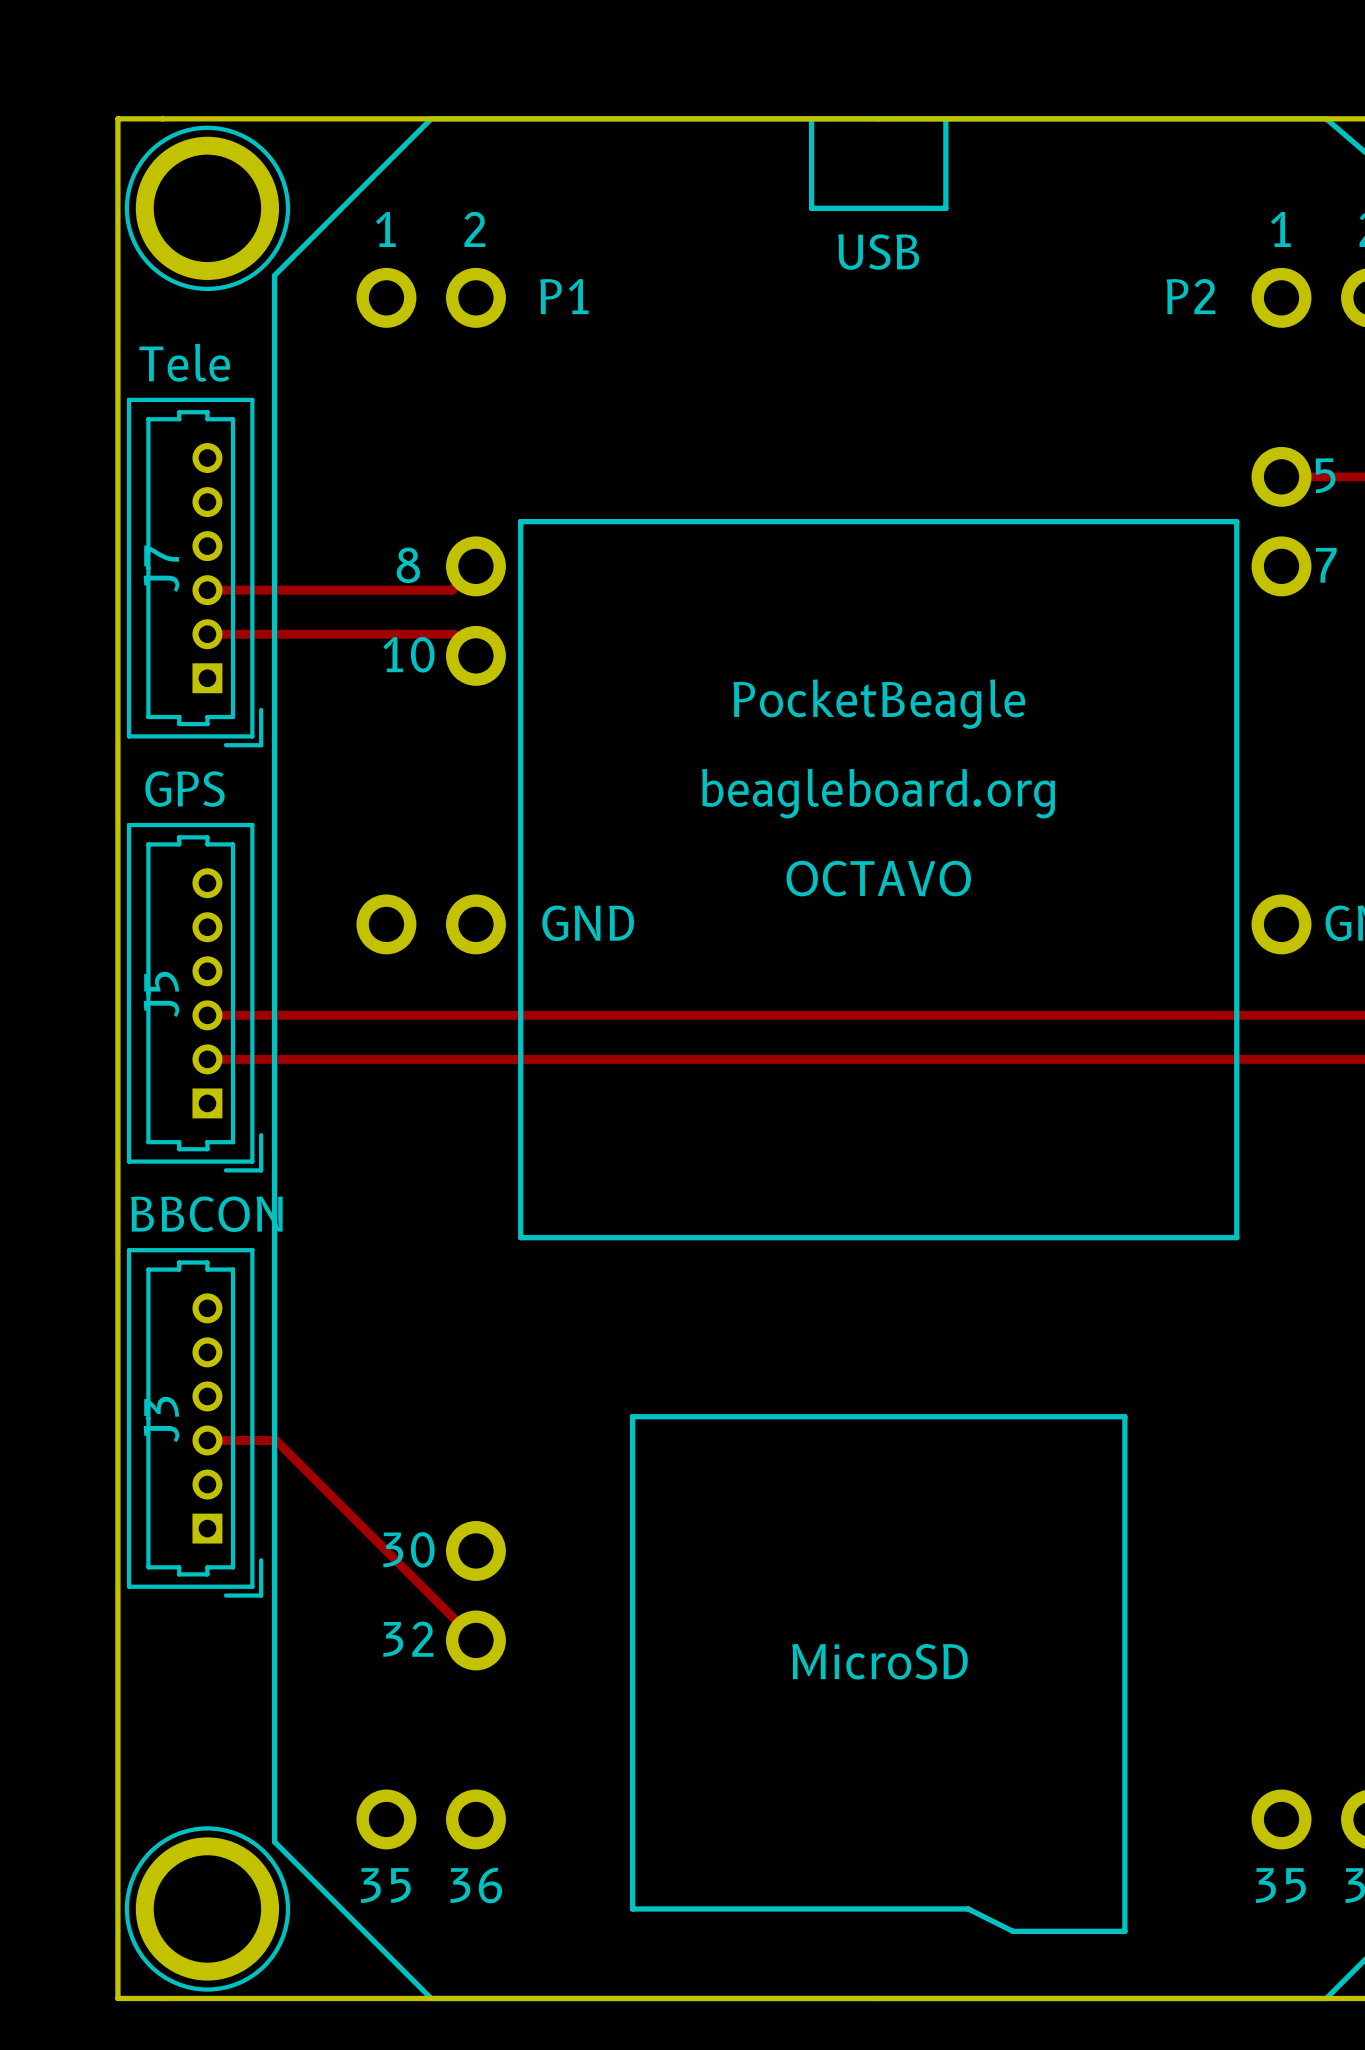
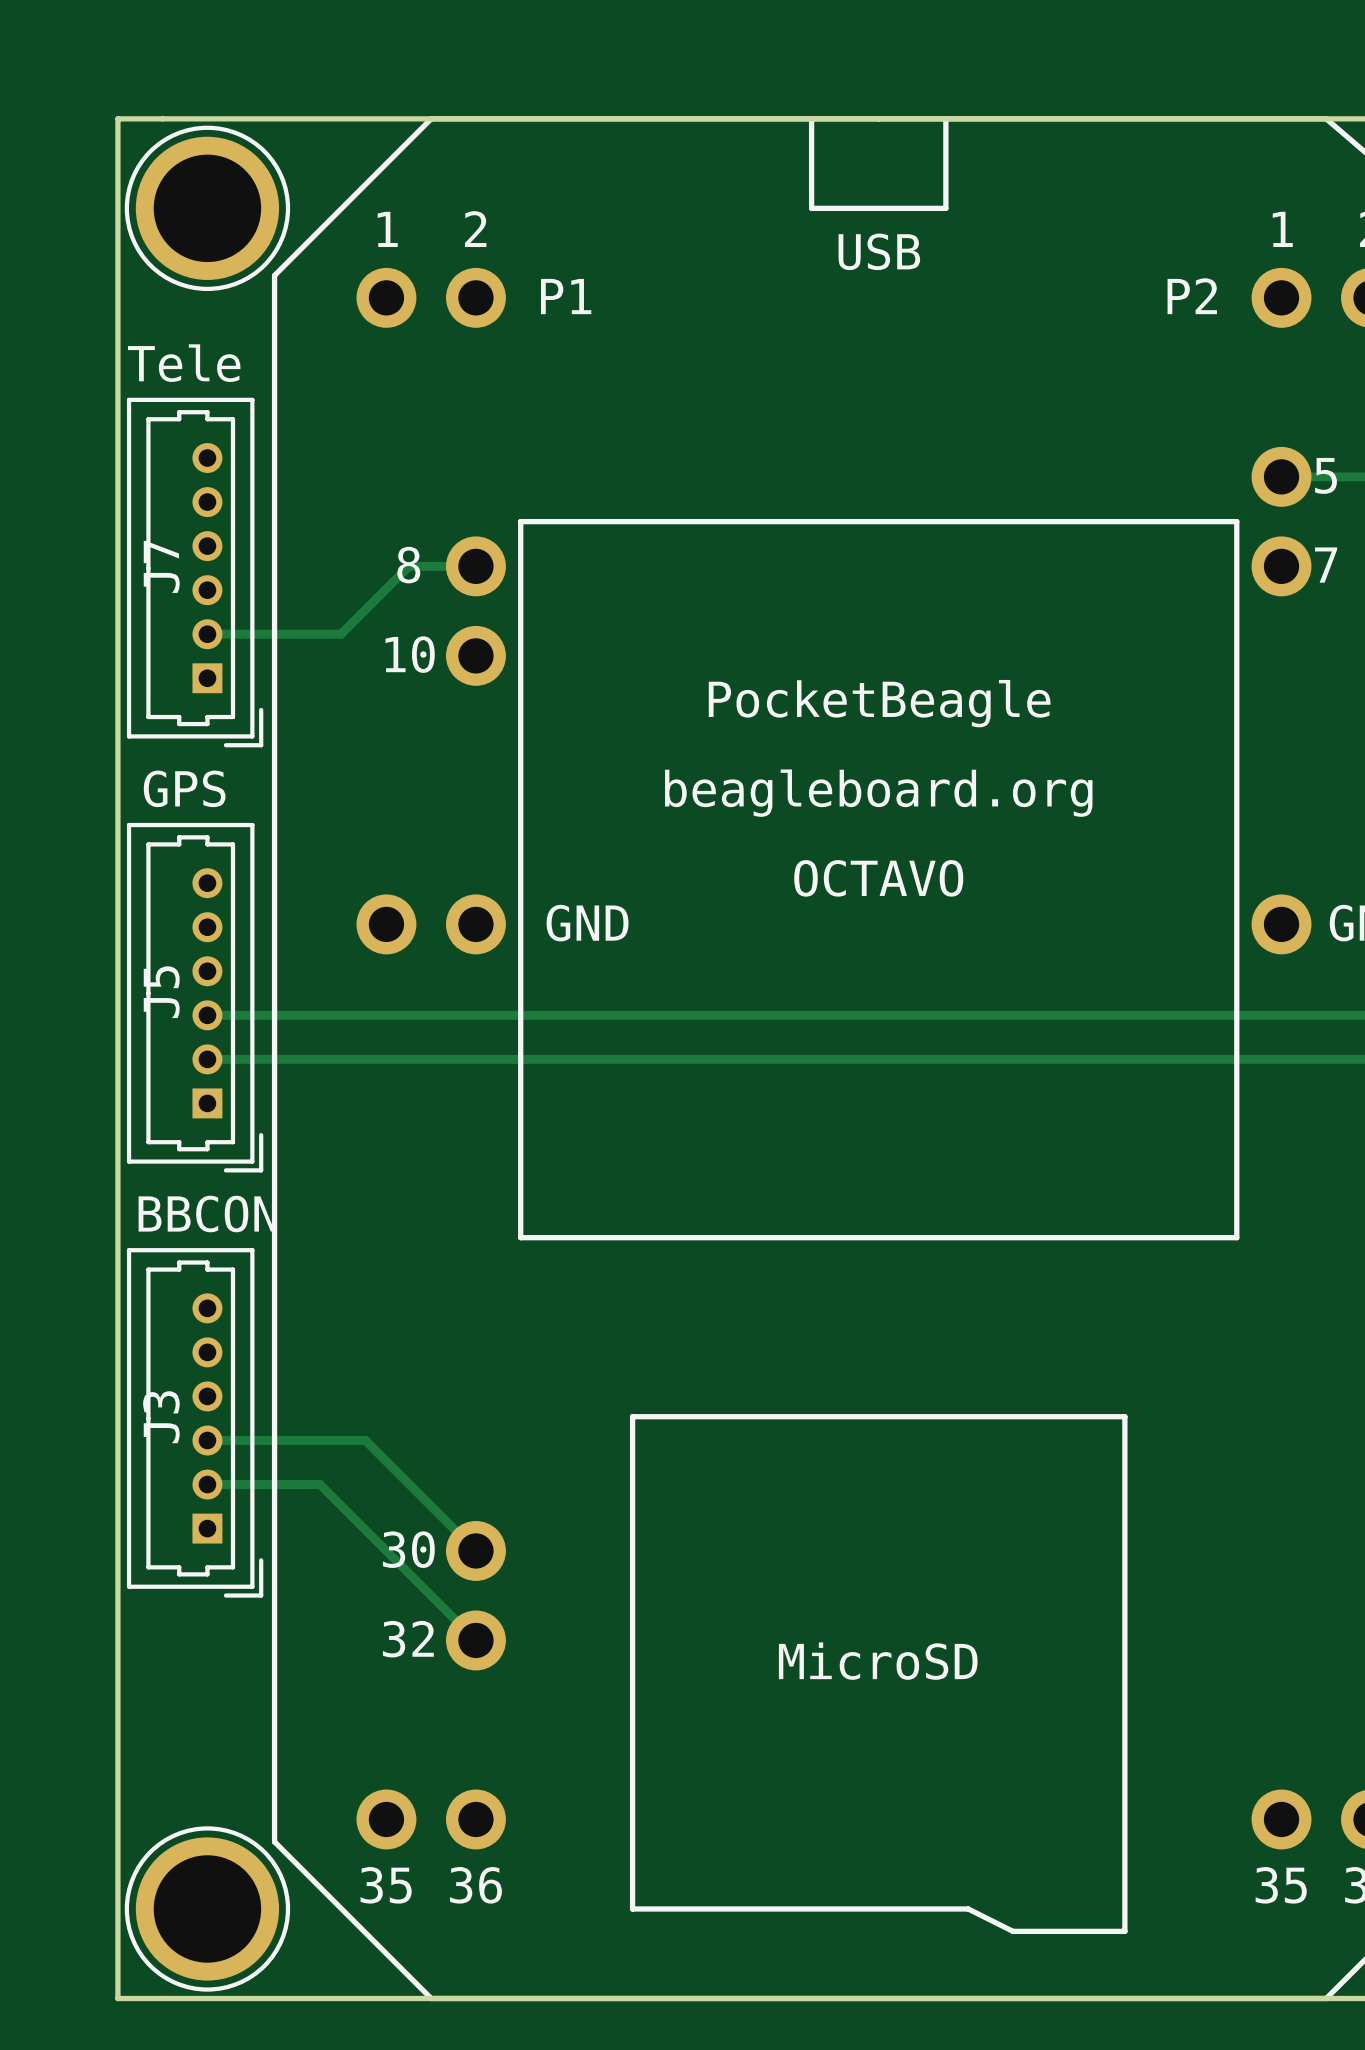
track: (475, 566) (452, 590) (207, 590) -> none
track: (340, 634) (454, 634) (475, 655) -> (340, 634) (408, 566) (475, 566)
track: (275, 1440) (320, 1484) -> (207, 1484) (320, 1484)
track: none -> (275, 1440) (365, 1440) (475, 1550)

